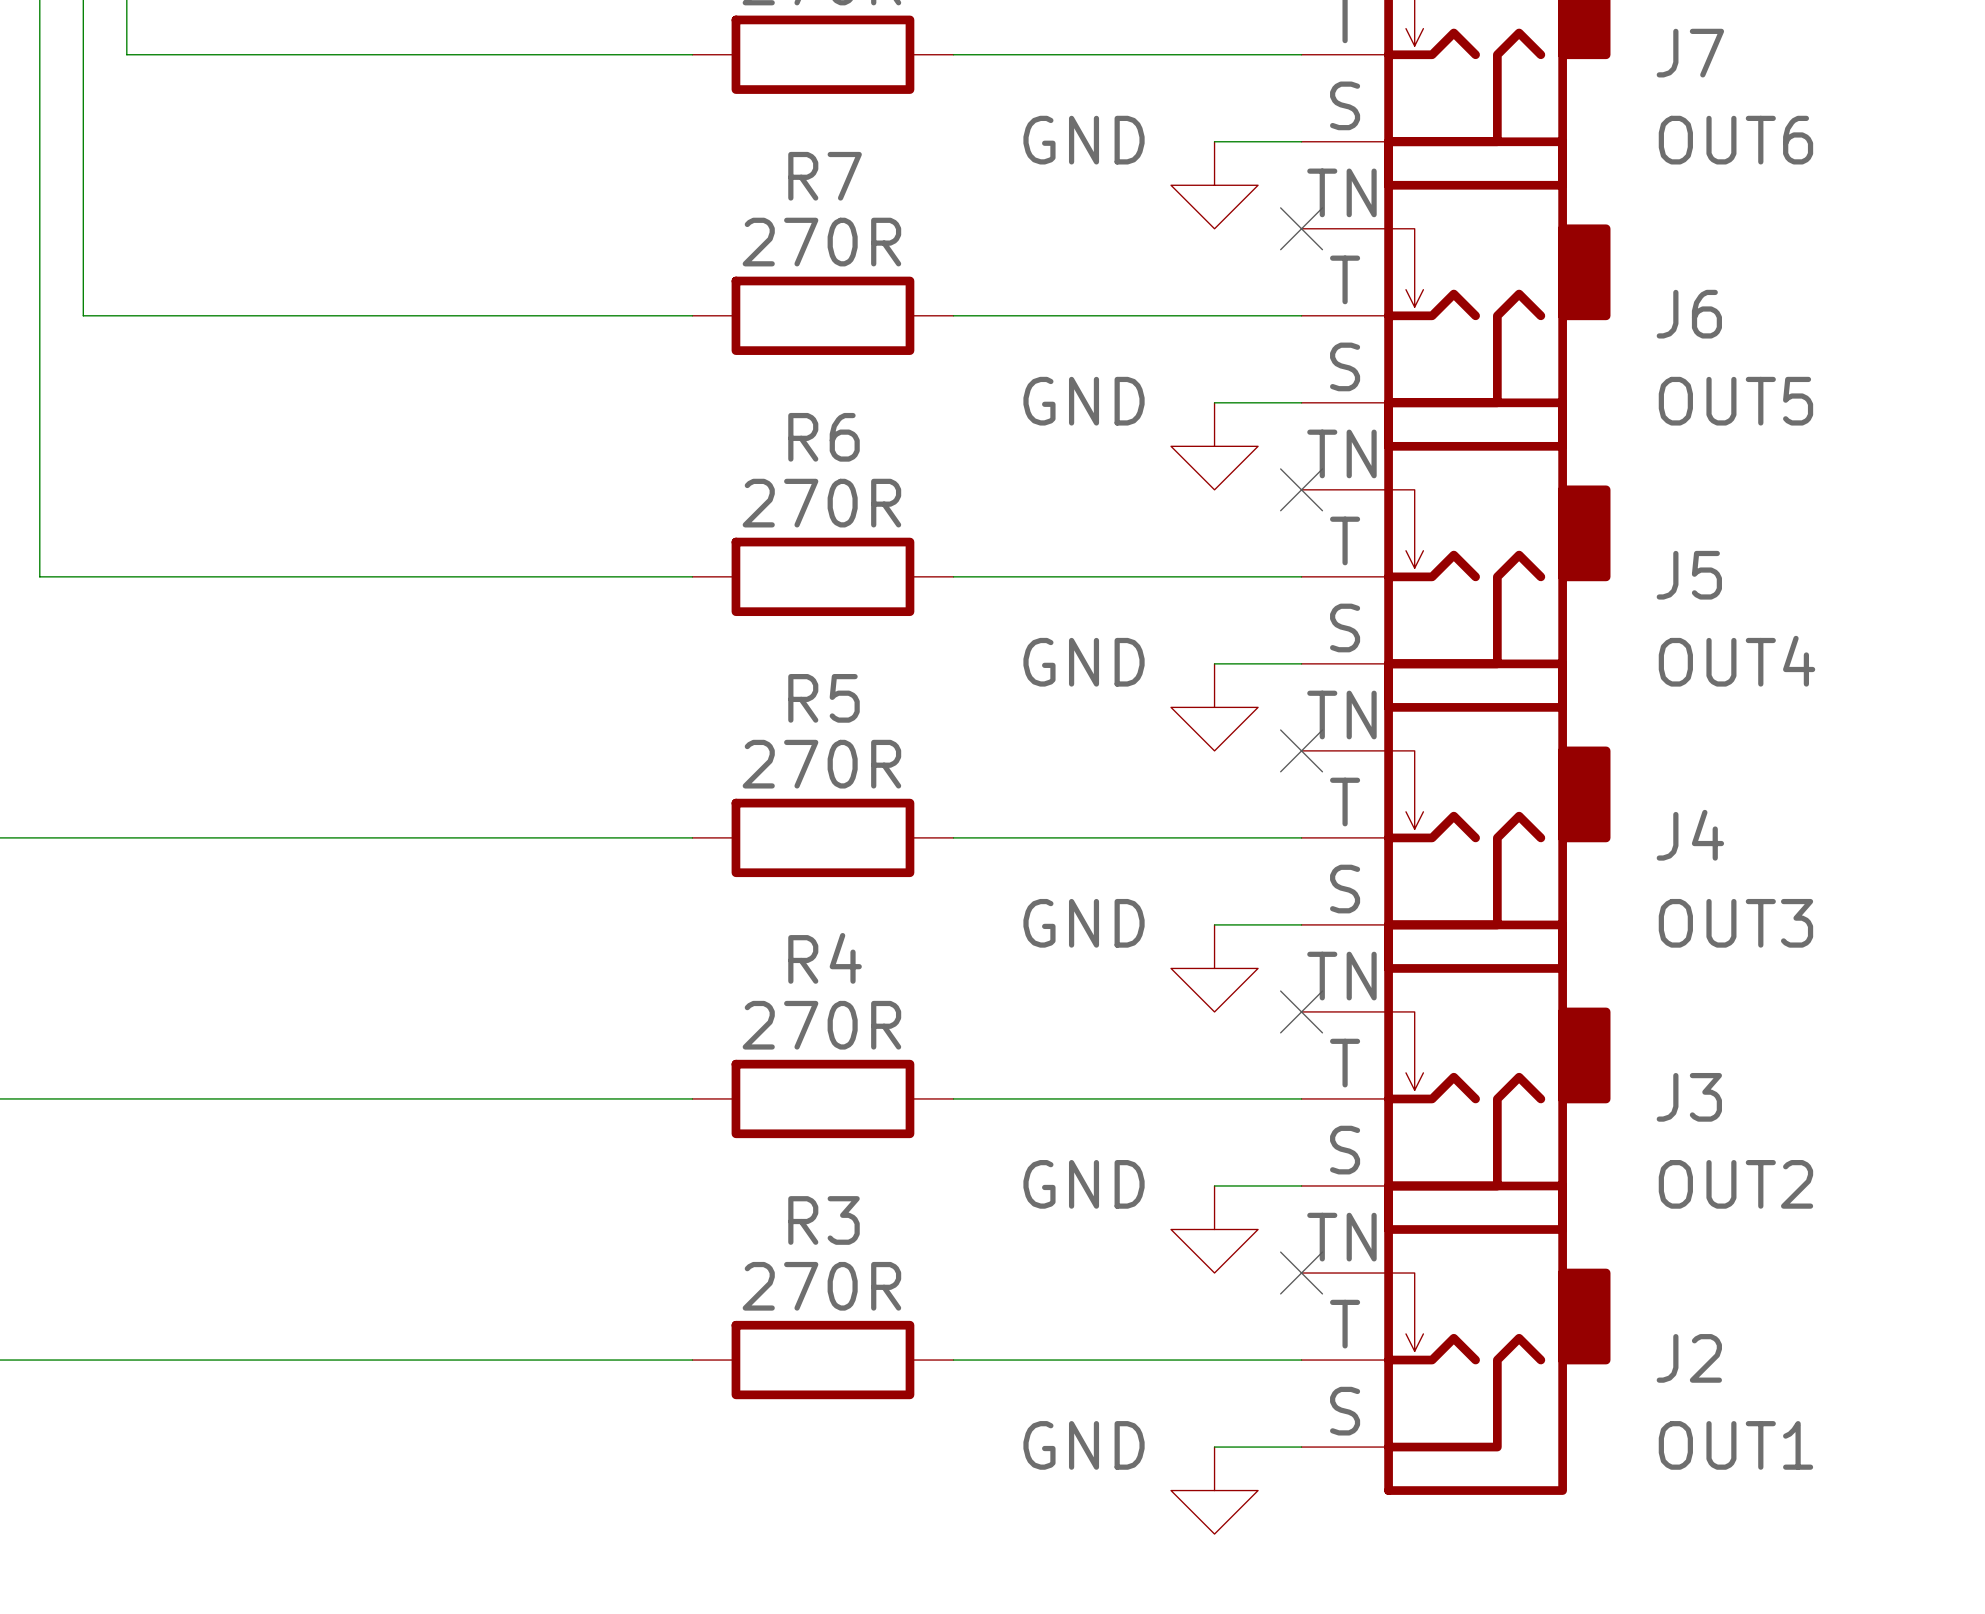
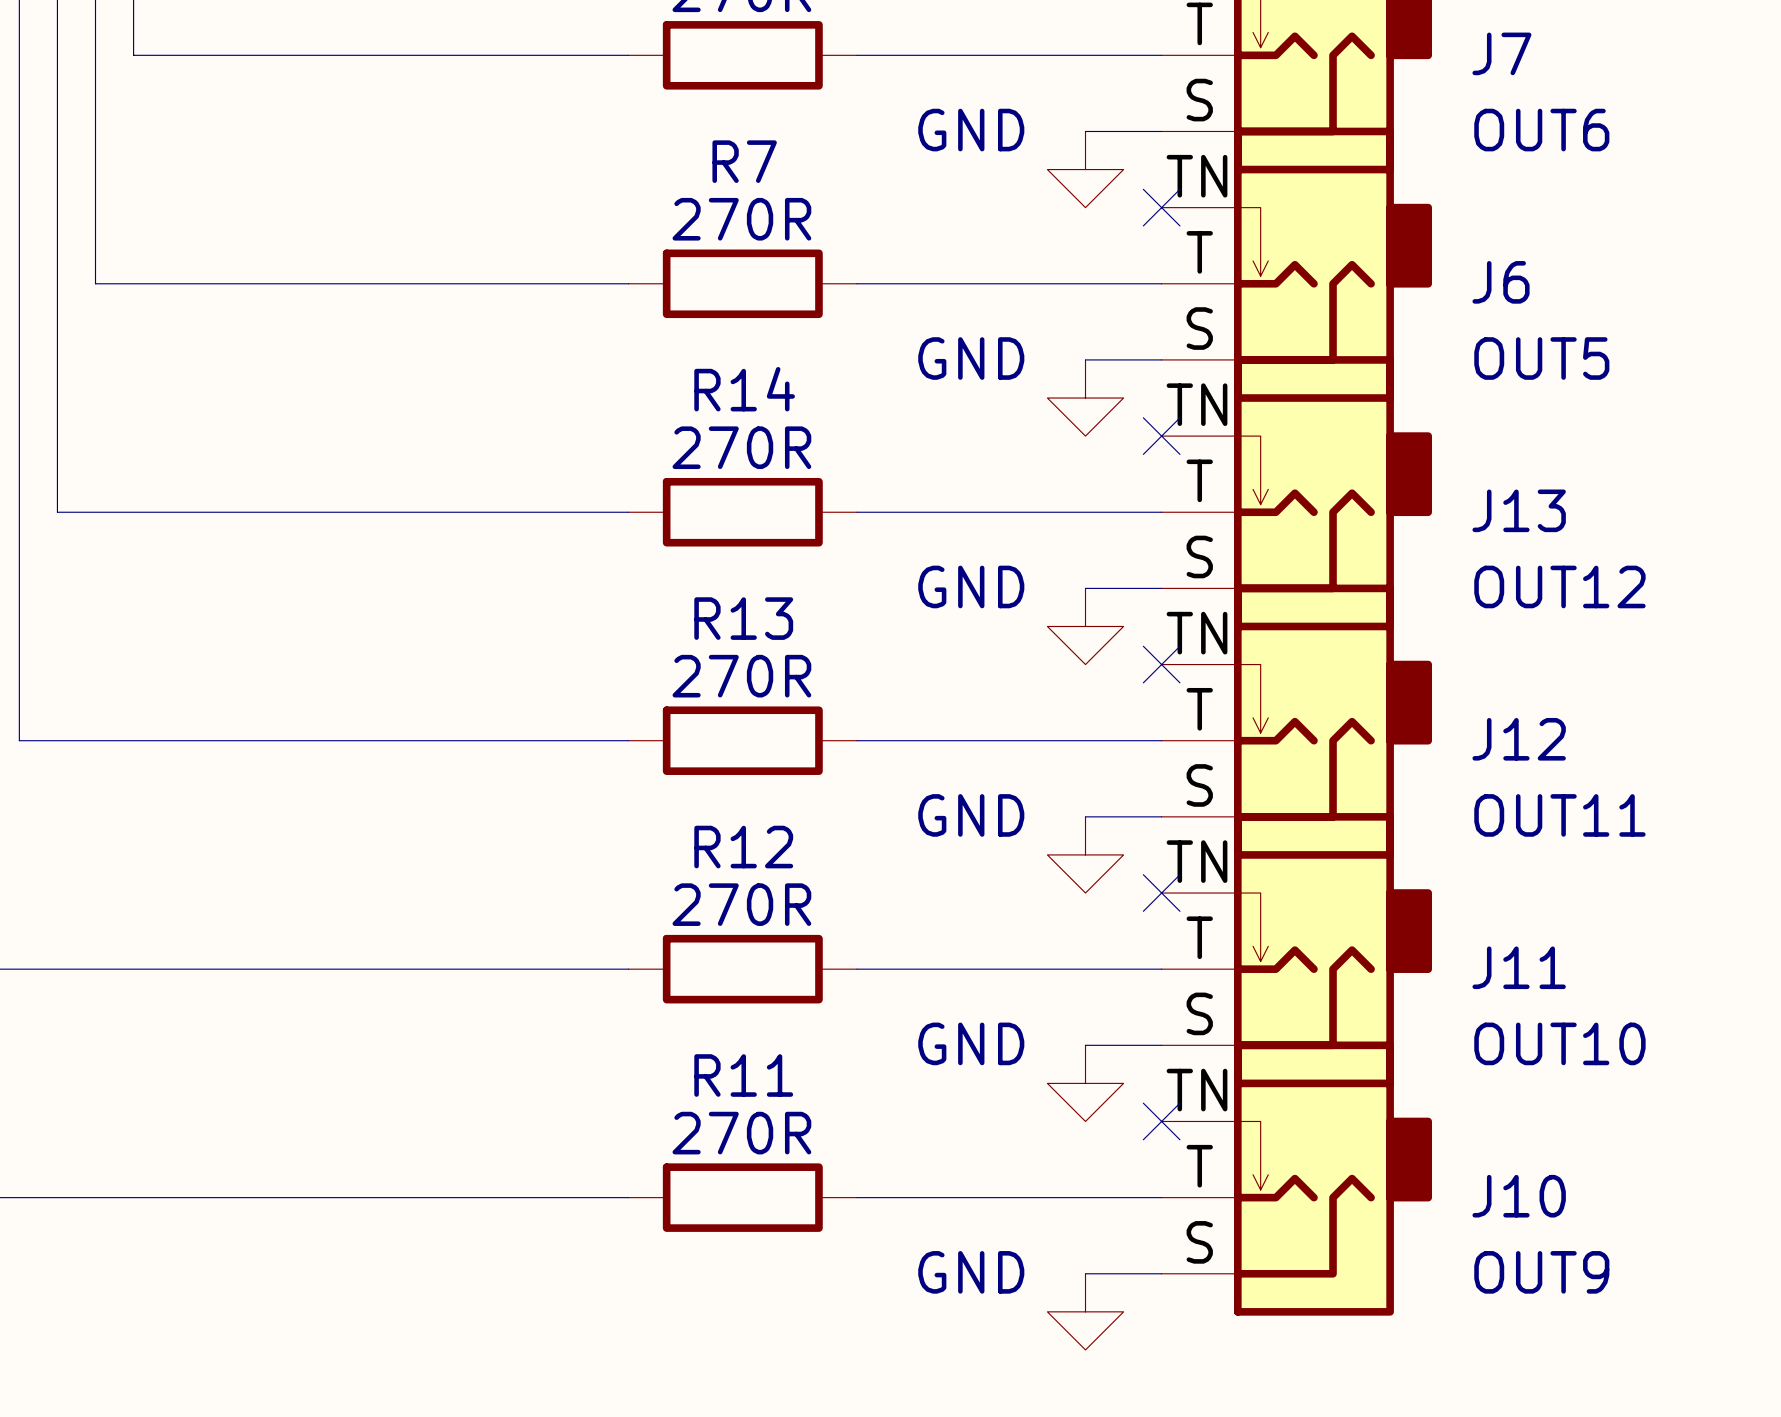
R6 name: R6 (824, 437) -> R14 (744, 389)
J5 name: J5 (1689, 575) -> J13 (1519, 510)
J5 value: OUT4 (1736, 661) -> OUT12 (1559, 586)
R5 name: R5 (824, 698) -> R13 (743, 618)
J4 name: J4 (1690, 835) -> J12 (1519, 739)
J4 value: OUT3 (1735, 923) -> OUT11 (1559, 815)
R4 name: R4 (825, 958) -> R12 (743, 847)
J3 name: J3 (1689, 1097) -> J11 (1519, 967)
J3 value: OUT2 (1735, 1184) -> OUT10 (1559, 1043)
R3 name: R3 (824, 1220) -> R11 (743, 1075)
J2 name: J2 (1689, 1358) -> J10 (1519, 1196)
J2 value: OUT1 (1735, 1445) -> OUT9 (1541, 1272)

